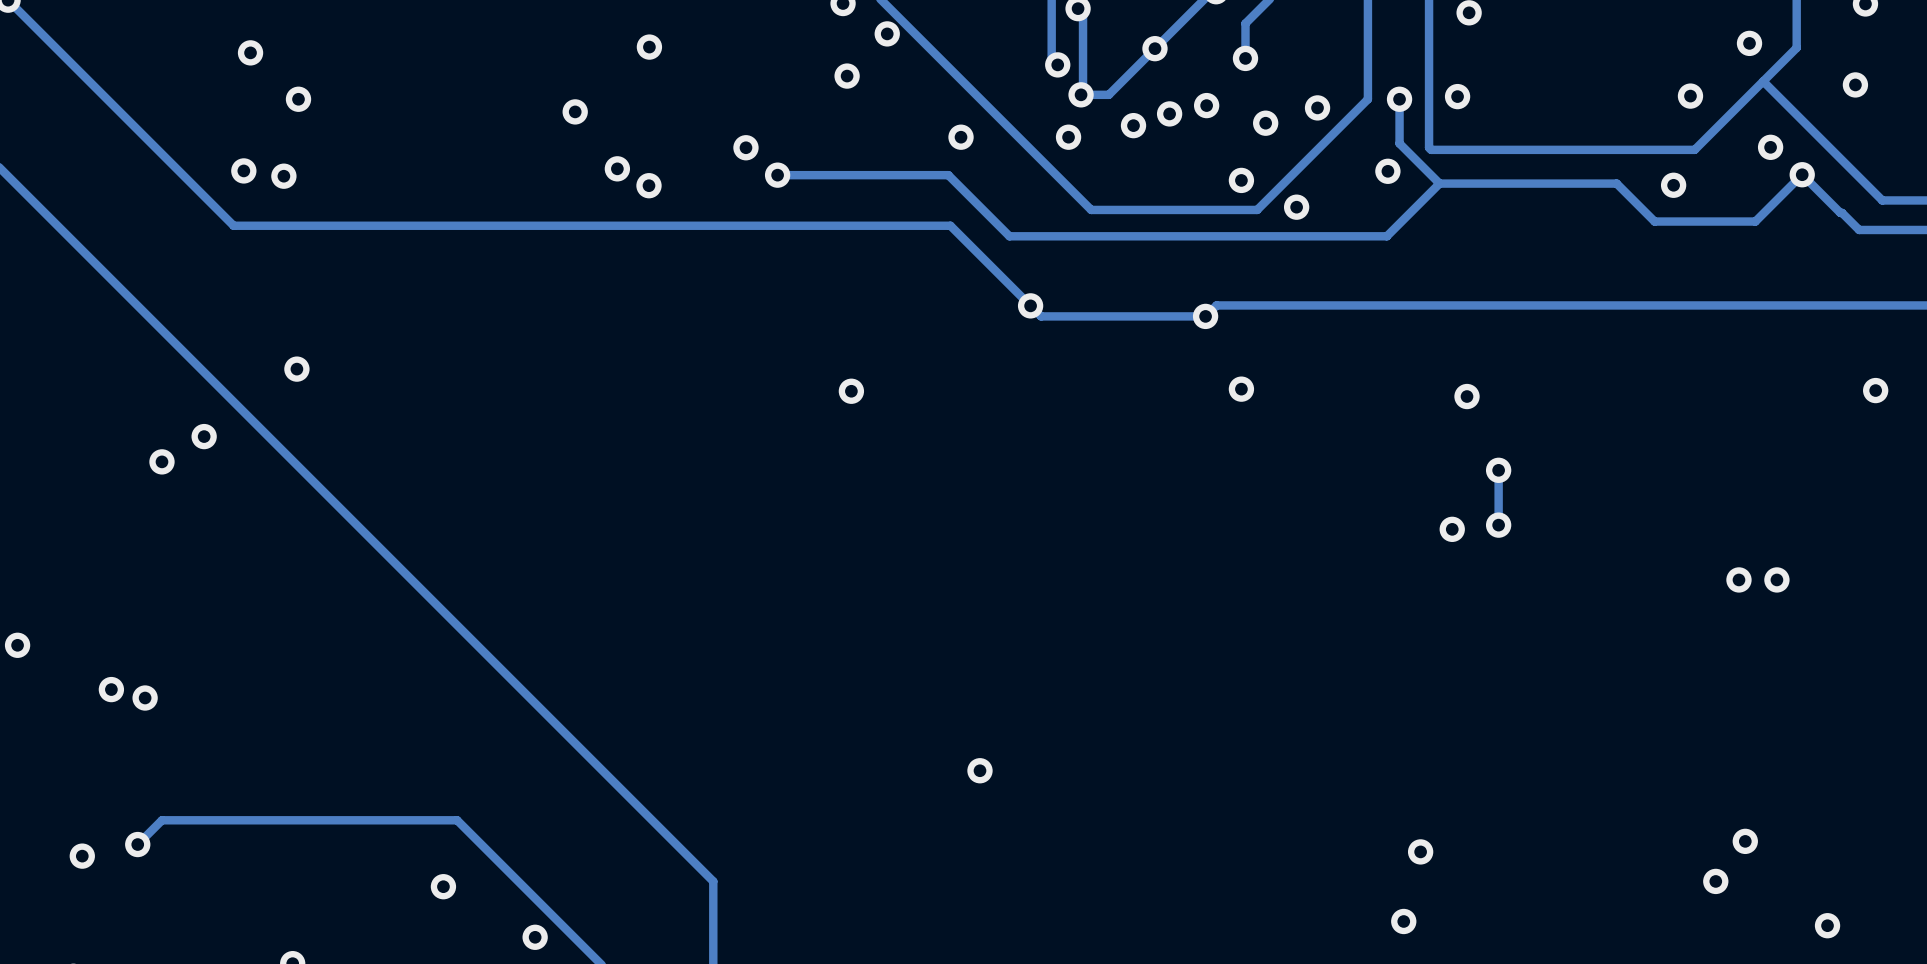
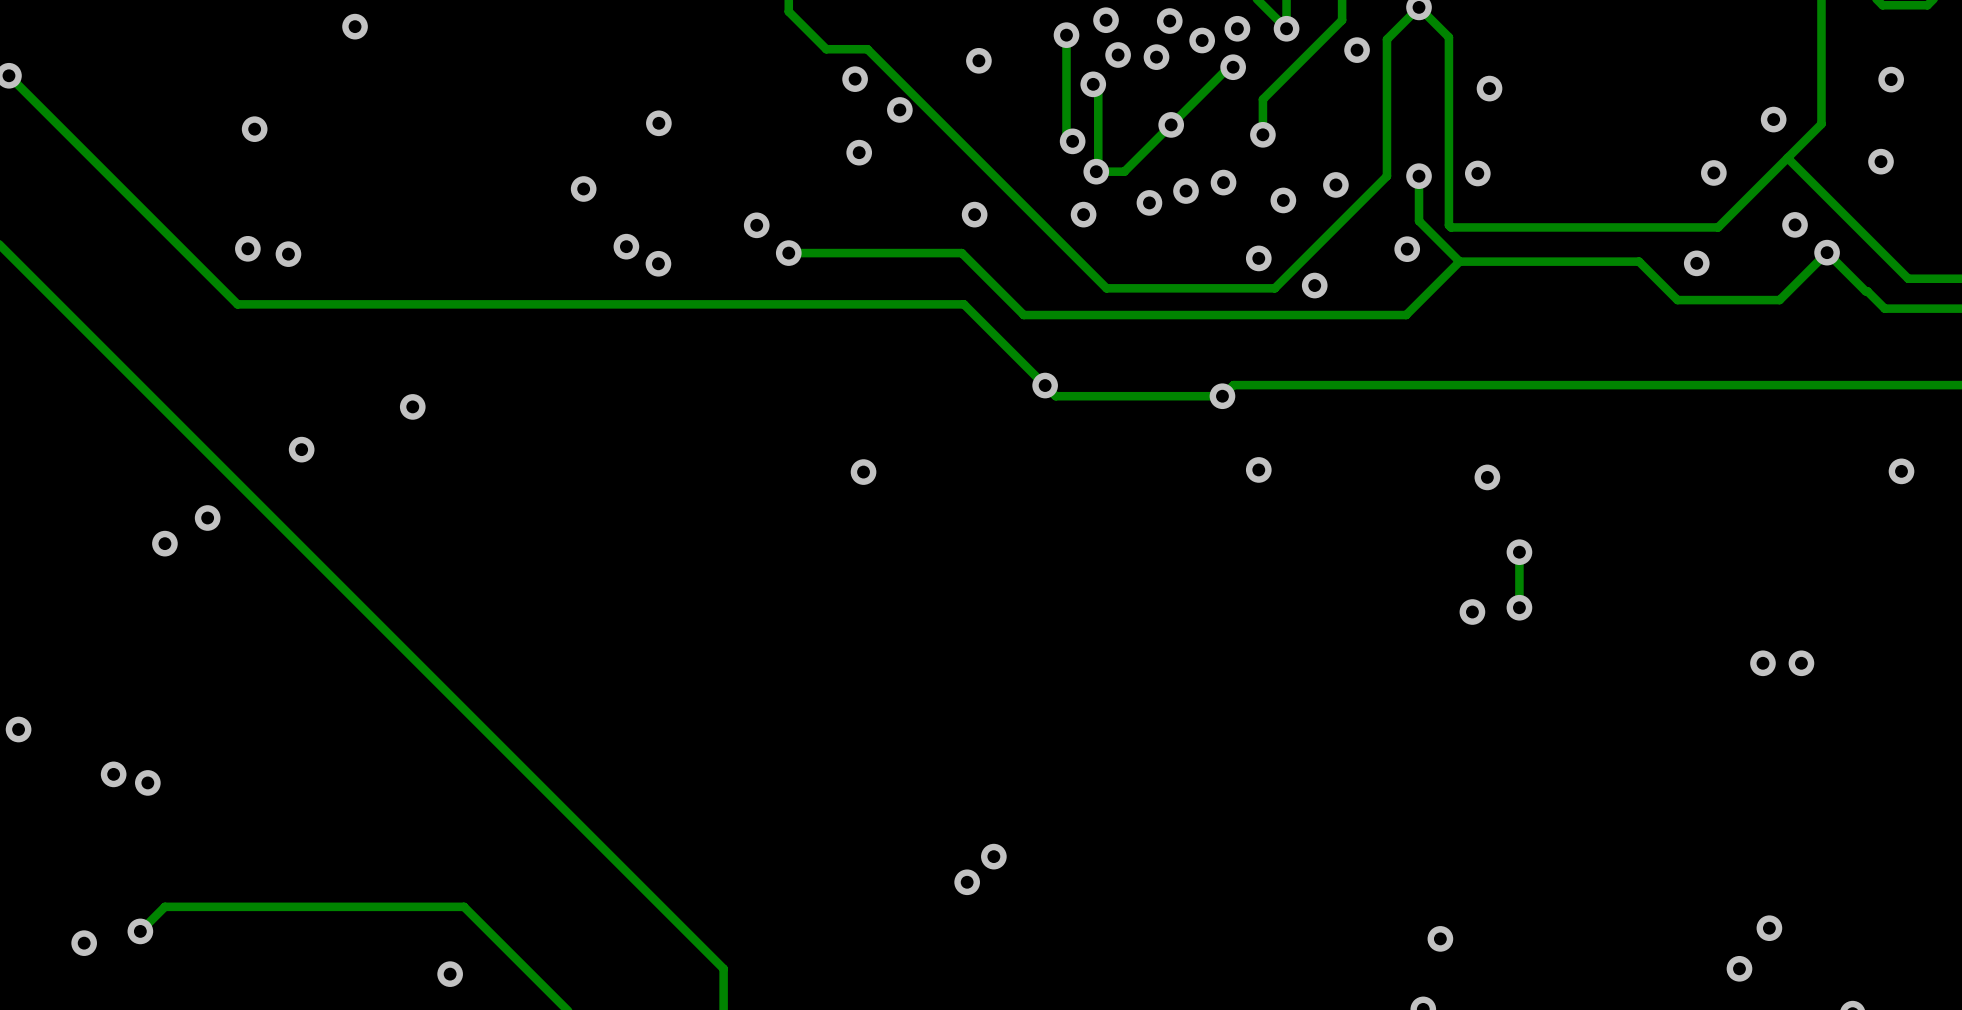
via position: (298, 99) -> (412, 406)
via: none -> (967, 882)

